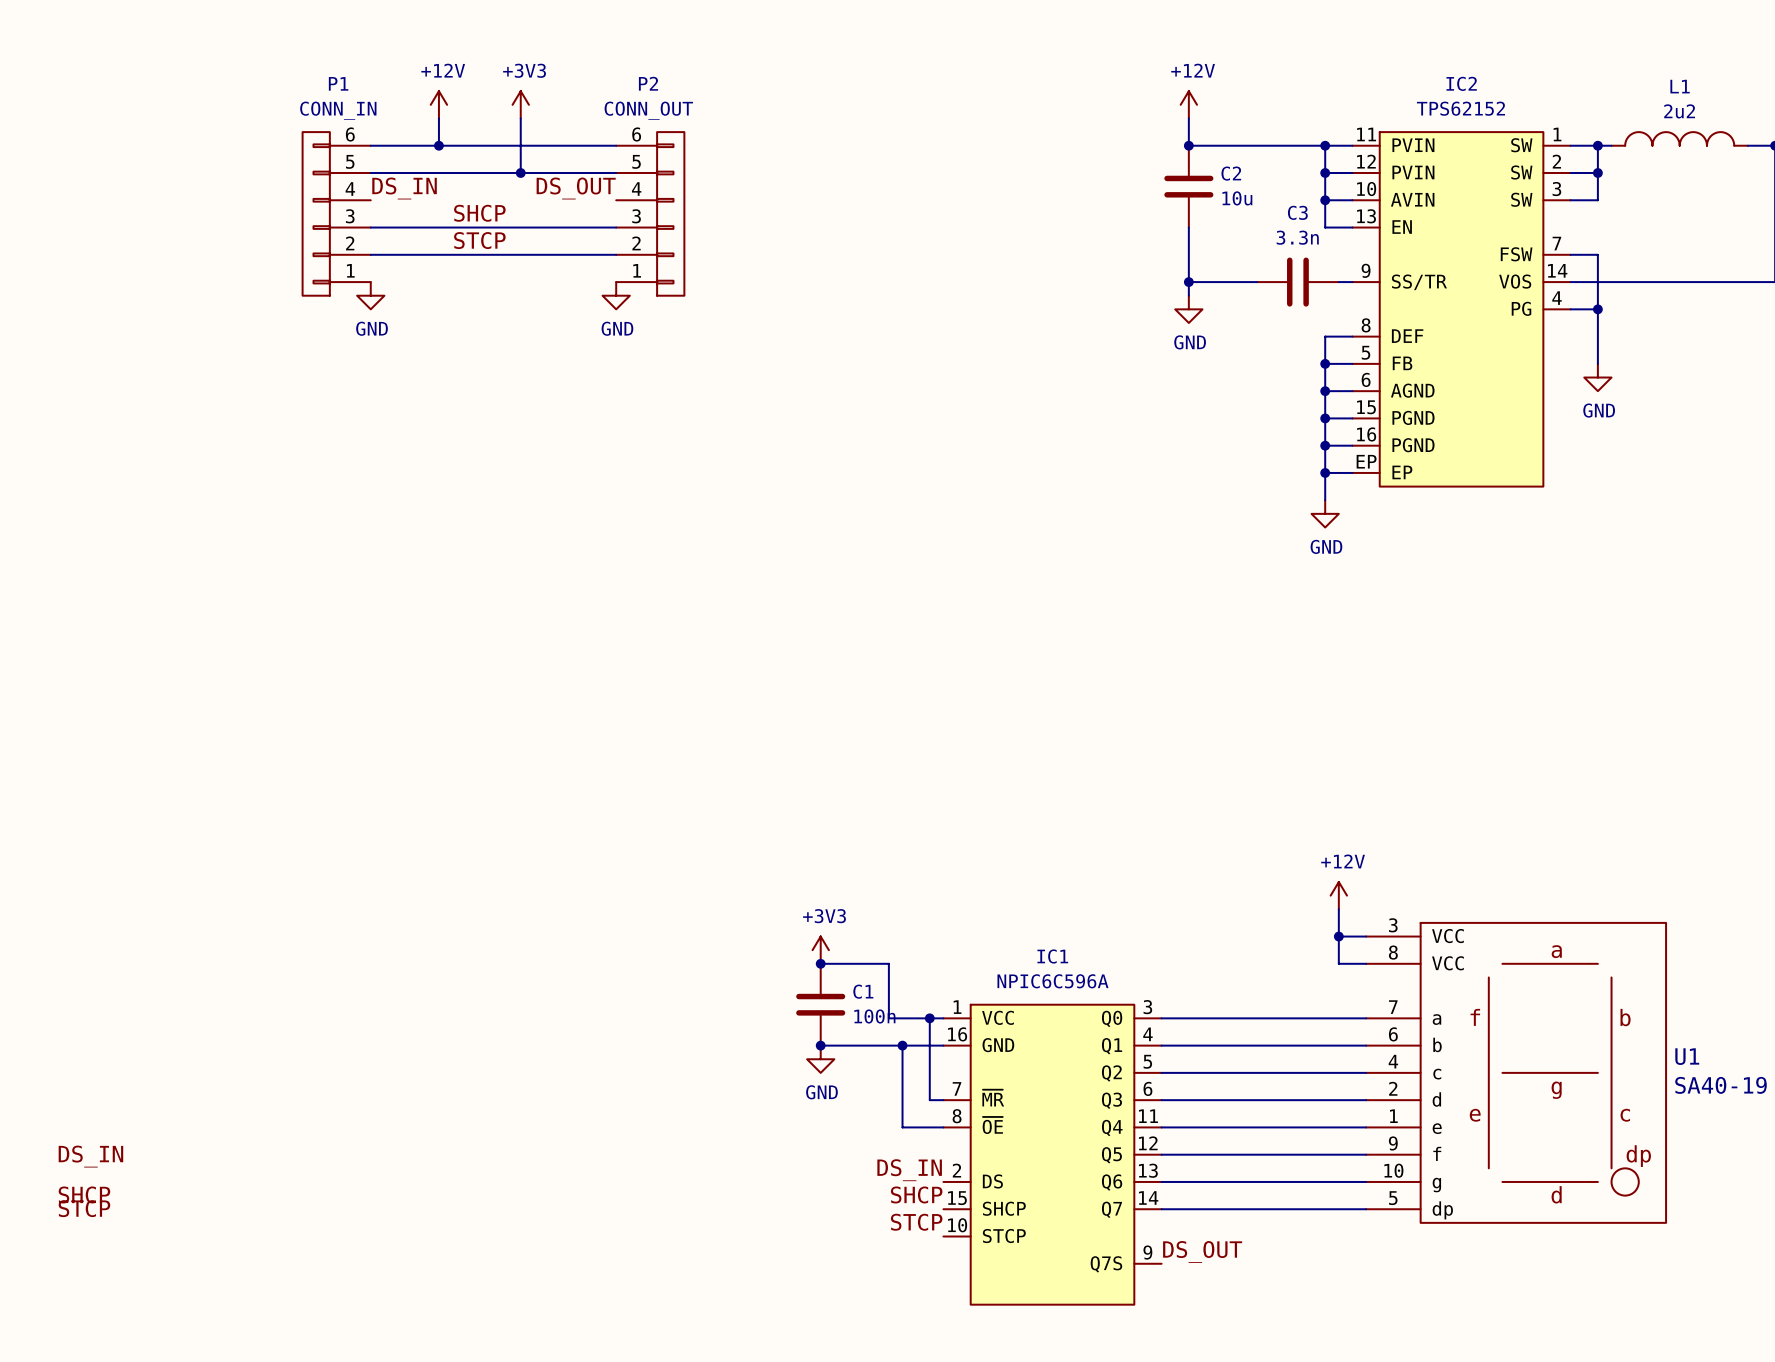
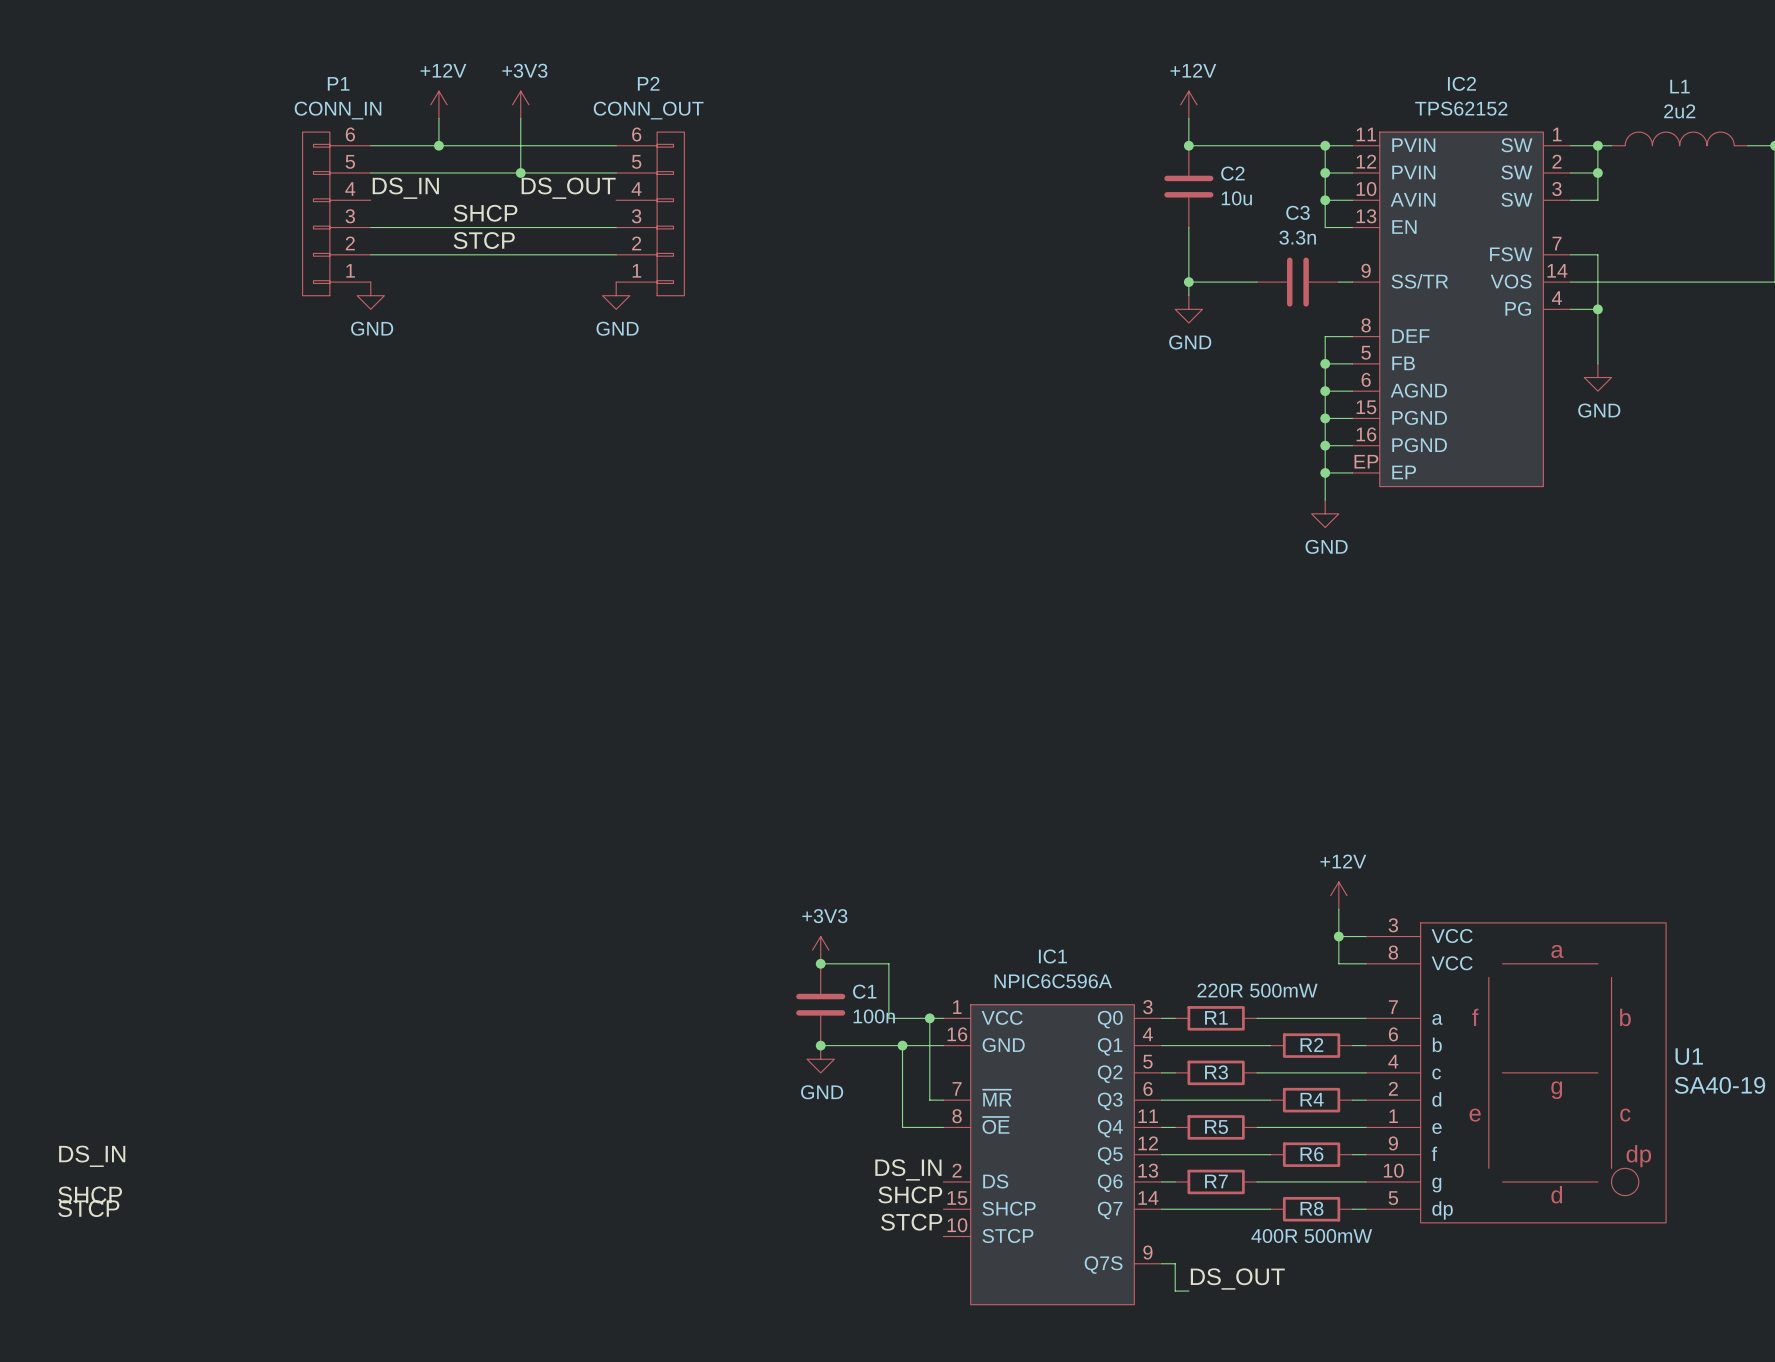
wire: (1175, 1018) (1257, 1018) -> none
R1: none -> 220R 500mW (1216, 1018)
wire: (1270, 1045) (1352, 1045) -> none
R2: none -> (1311, 1045)
wire: (1175, 1072) (1257, 1072) -> none
R3: none -> (1216, 1072)
wire: (1270, 1100) (1352, 1100) -> none
R4: none -> (1311, 1100)
wire: (1175, 1127) (1257, 1127) -> none
R5: none -> (1216, 1127)
wire: (1270, 1154) (1352, 1154) -> none
R6: none -> (1311, 1154)
wire: (1175, 1181) (1257, 1181) -> none
R7: none -> (1216, 1181)
wire: (1270, 1209) (1352, 1209) -> none
R8: none -> 400R 500mW (1311, 1209)
label position: DS_OUT (1202, 1252) -> DS_OUT (1237, 1279)
wire: none -> (1161, 1263) (1175, 1263) (1175, 1291) (1188, 1291)

